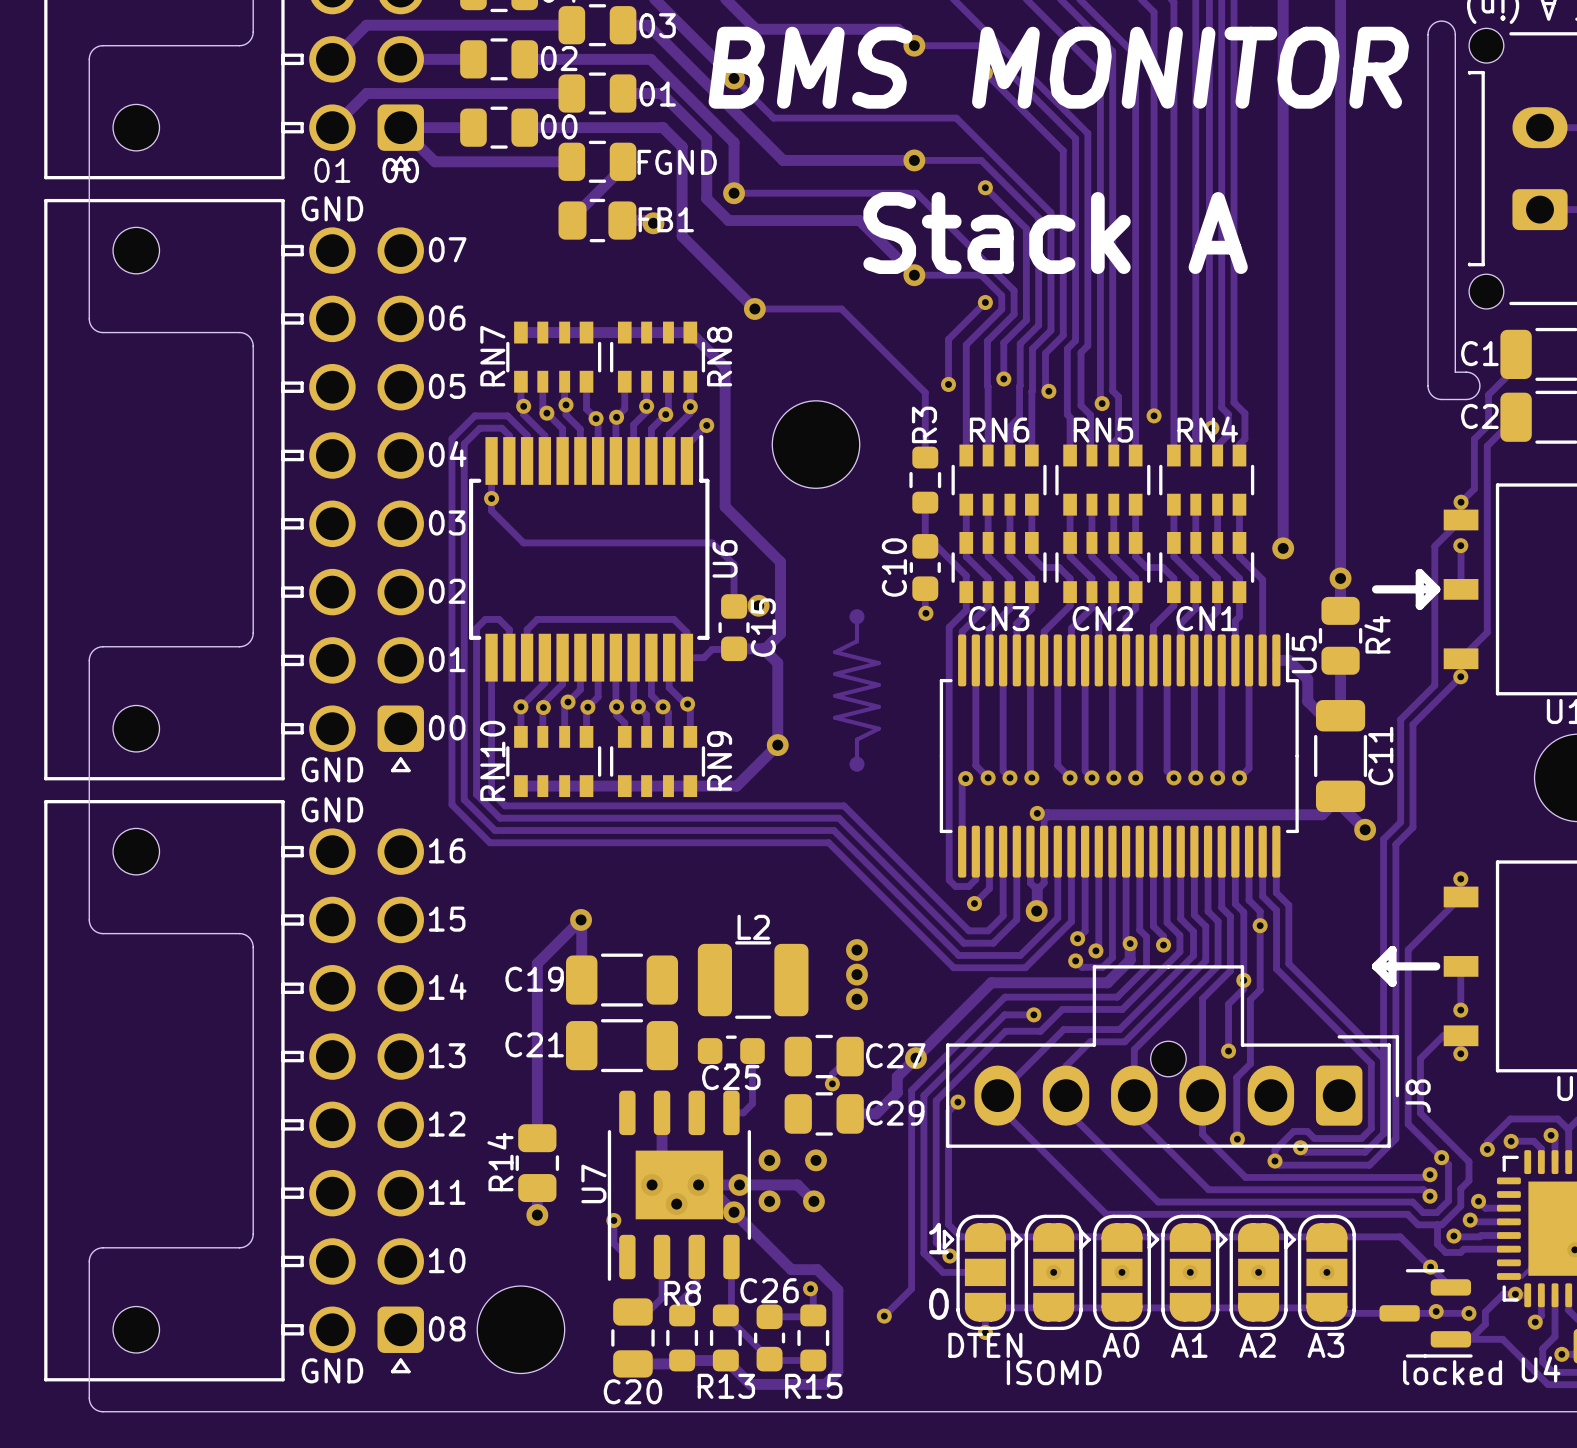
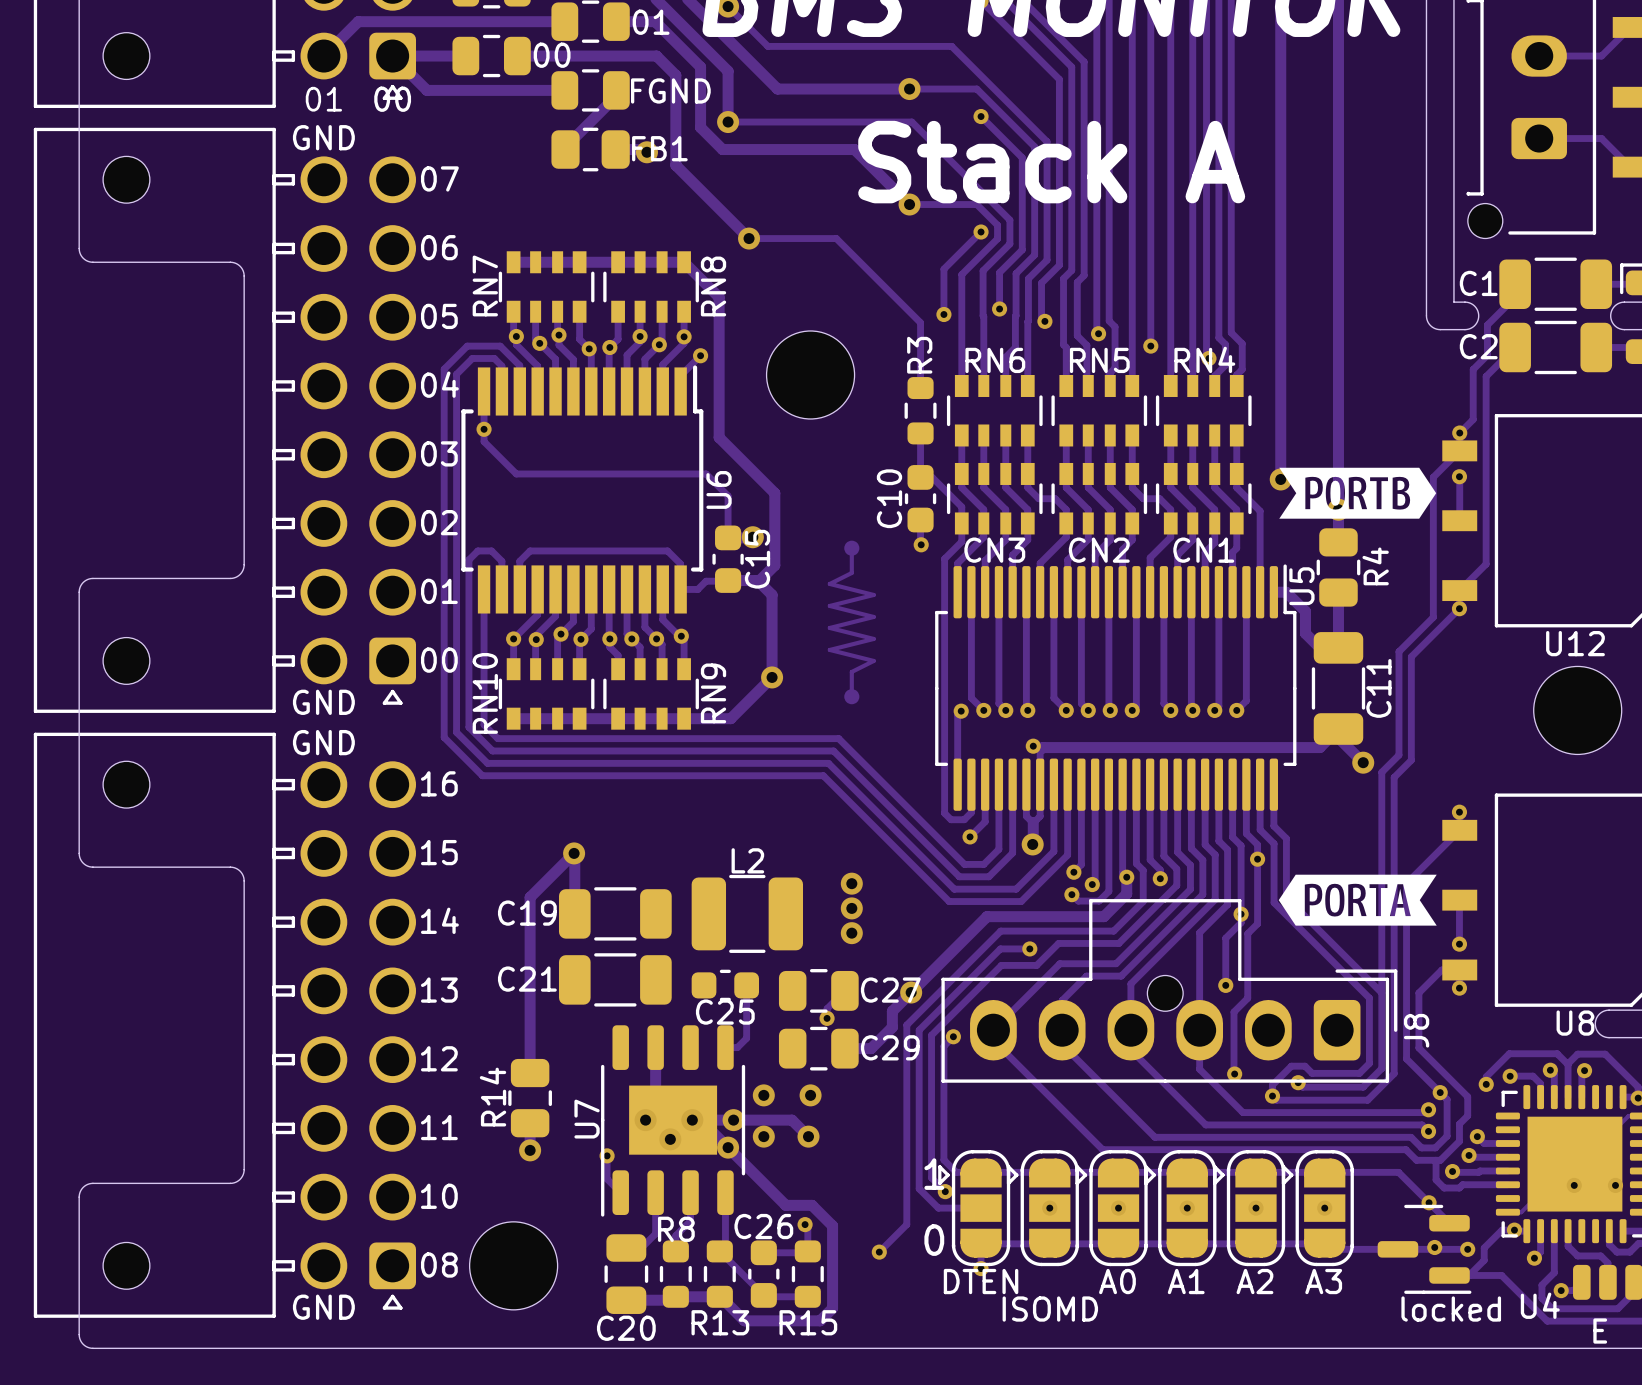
drawing: none -> [1279, 467, 1437, 519]
line: (1376, 589) (1436, 589) -> none
line: (1436, 589) (1419, 605) (1419, 572) (1436, 589) -> none
drawing: none -> [1278, 874, 1437, 926]
line: (1376, 966) (1392, 950) (1392, 982) (1376, 966) -> none
line: (1376, 966) (1436, 966) -> none

